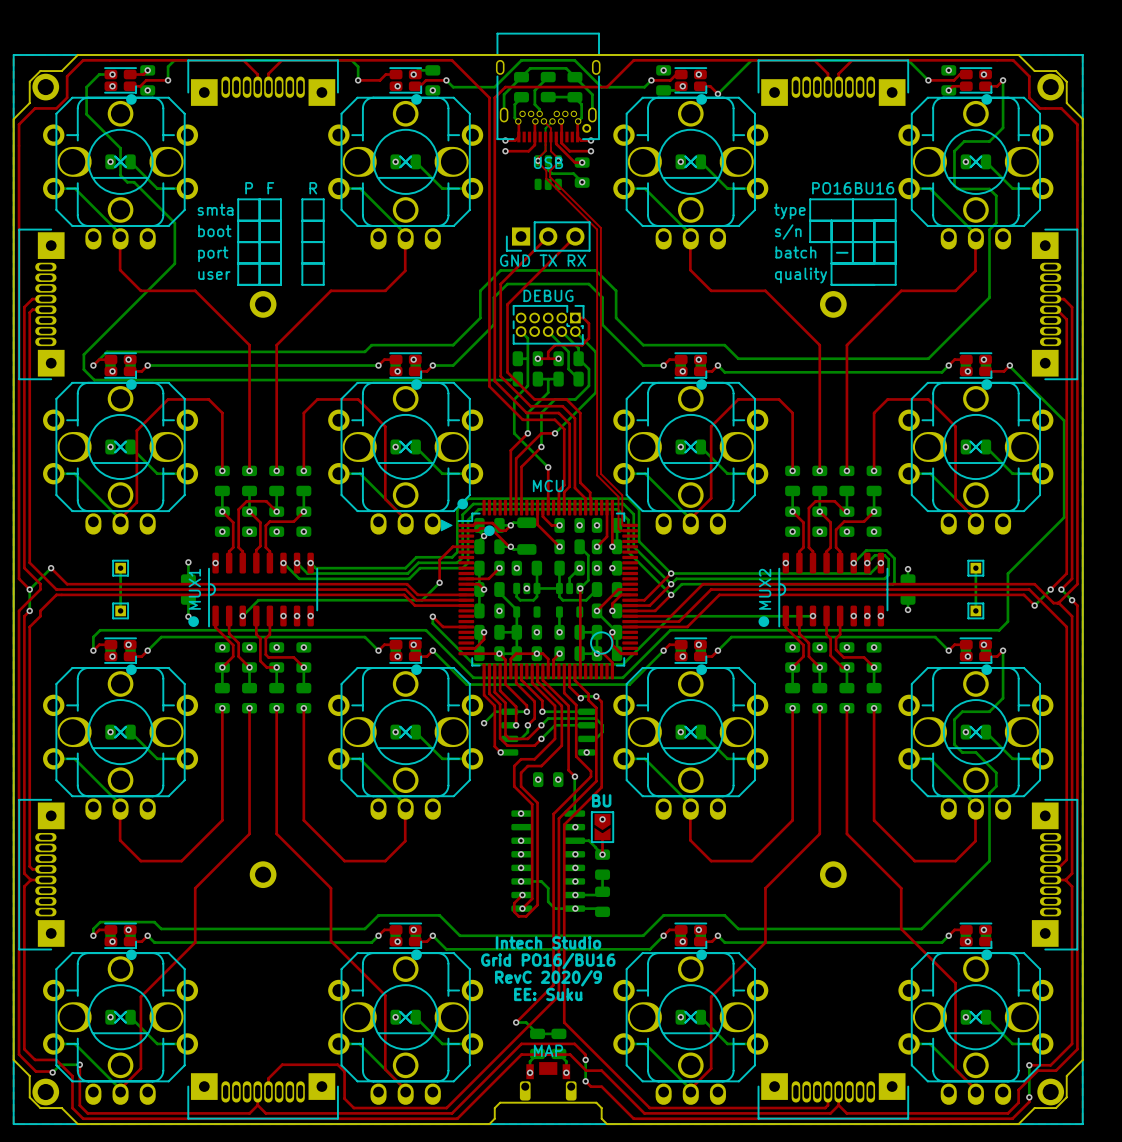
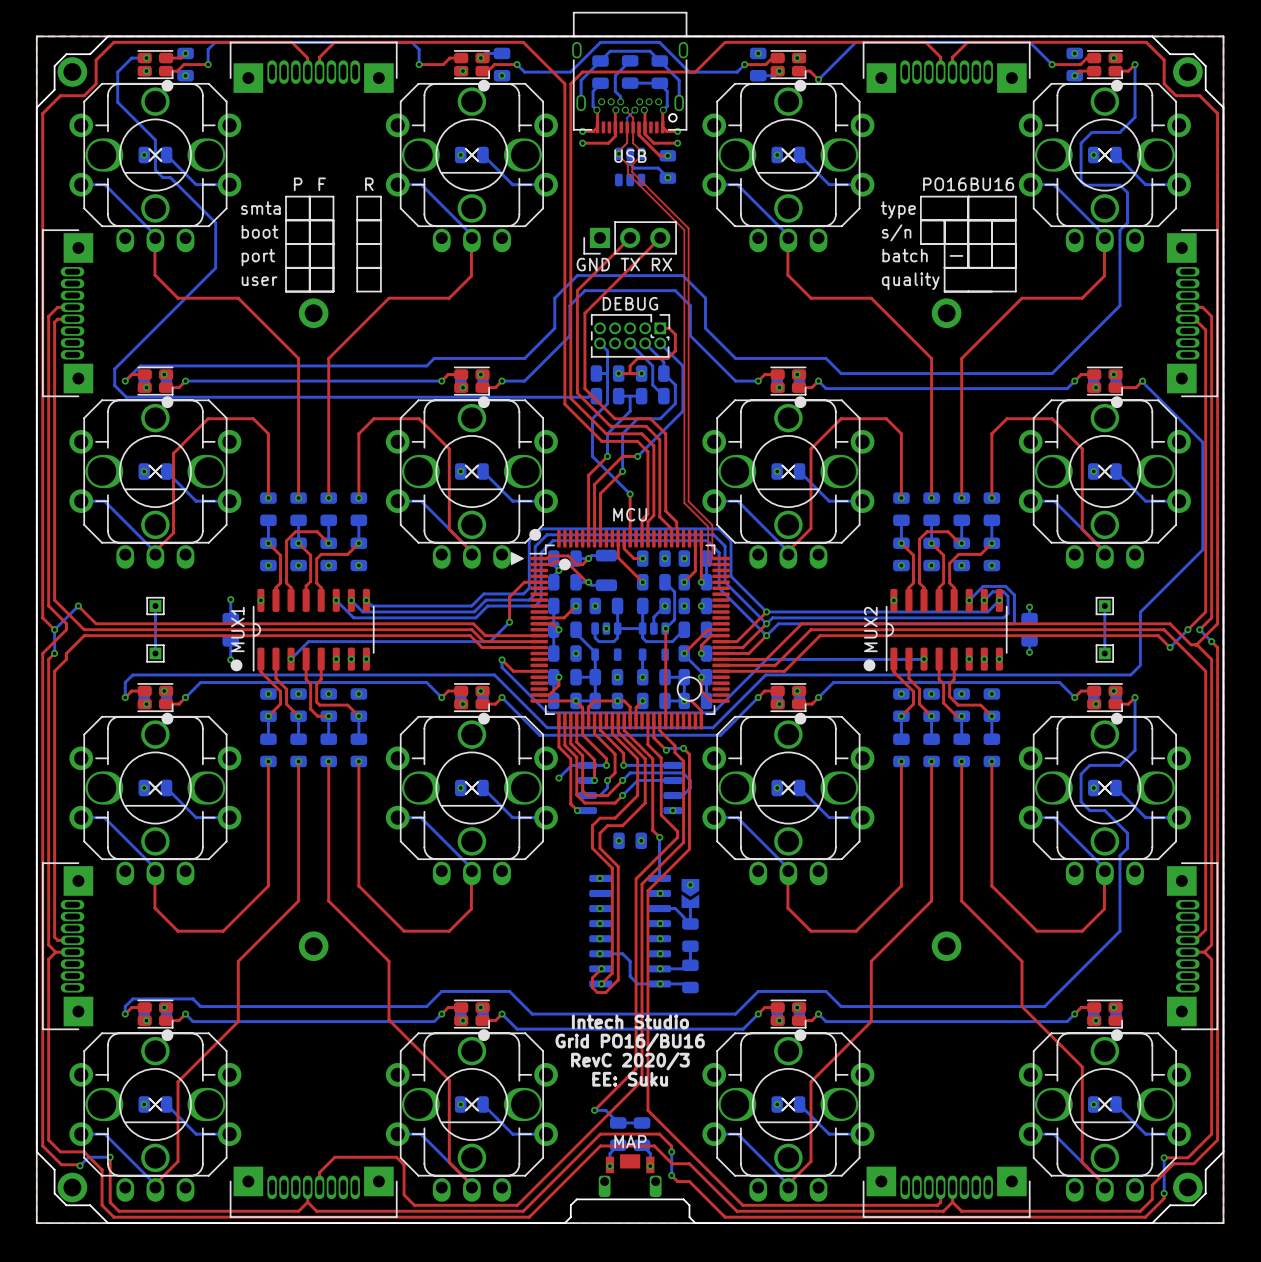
text: BU (601, 800) -> none
part side: top (602, 827) -> bottom (690, 893)
bottom track: none -> (690, 902) (690, 924)
top track: (602, 834) (602, 854) -> none
via: (602, 854) -> none
text: RevC 2020/9 (548, 978) -> RevC 2020/3 (630, 1061)

